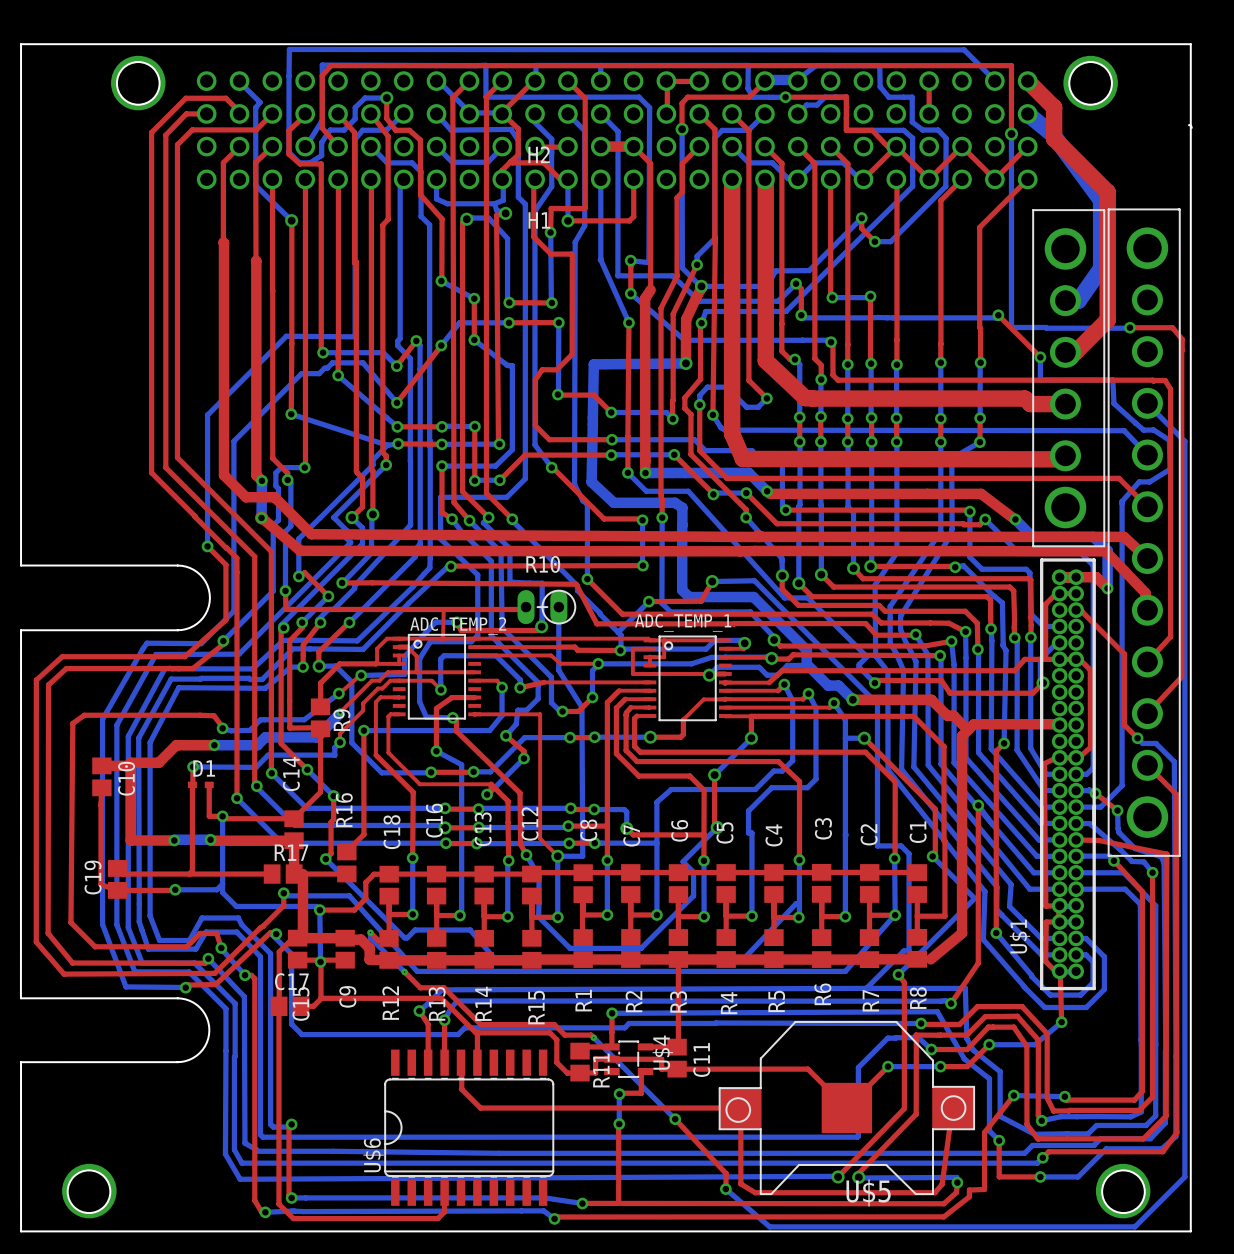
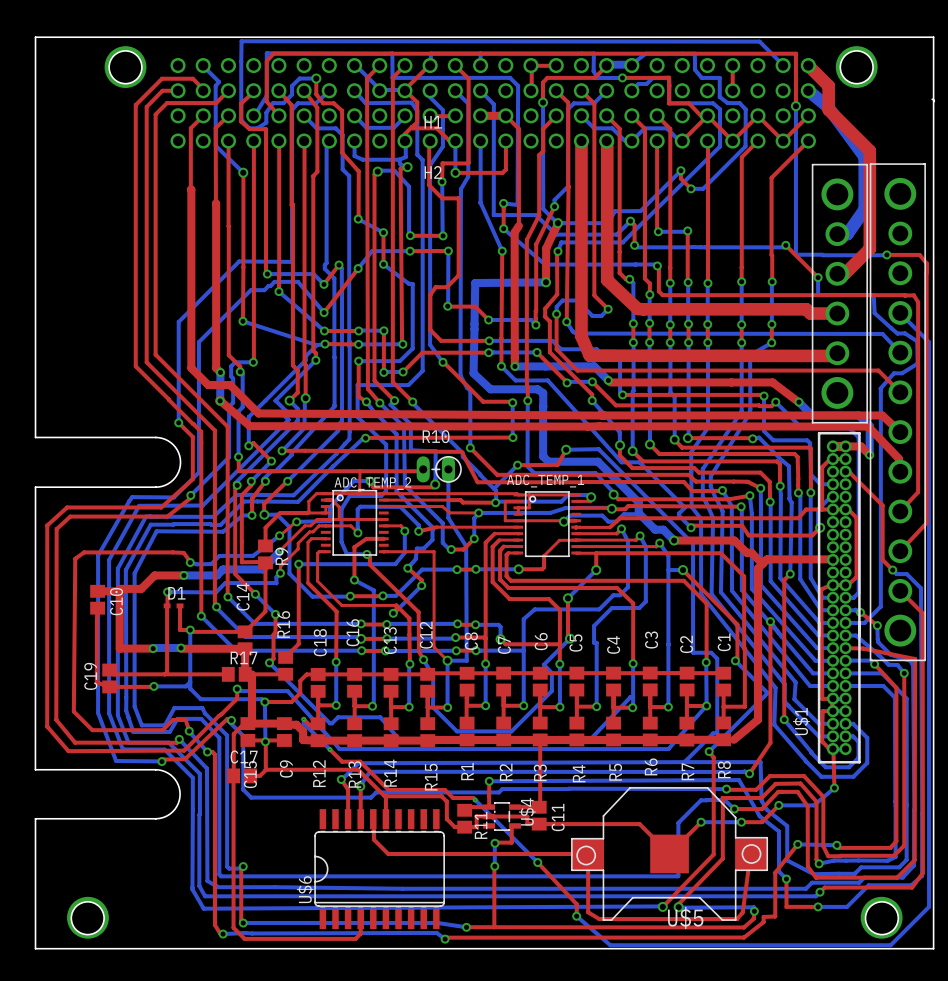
H2 name: H2 (539, 154) -> H1 (433, 122)
H1 name: H1 (539, 220) -> H2 (433, 172)

